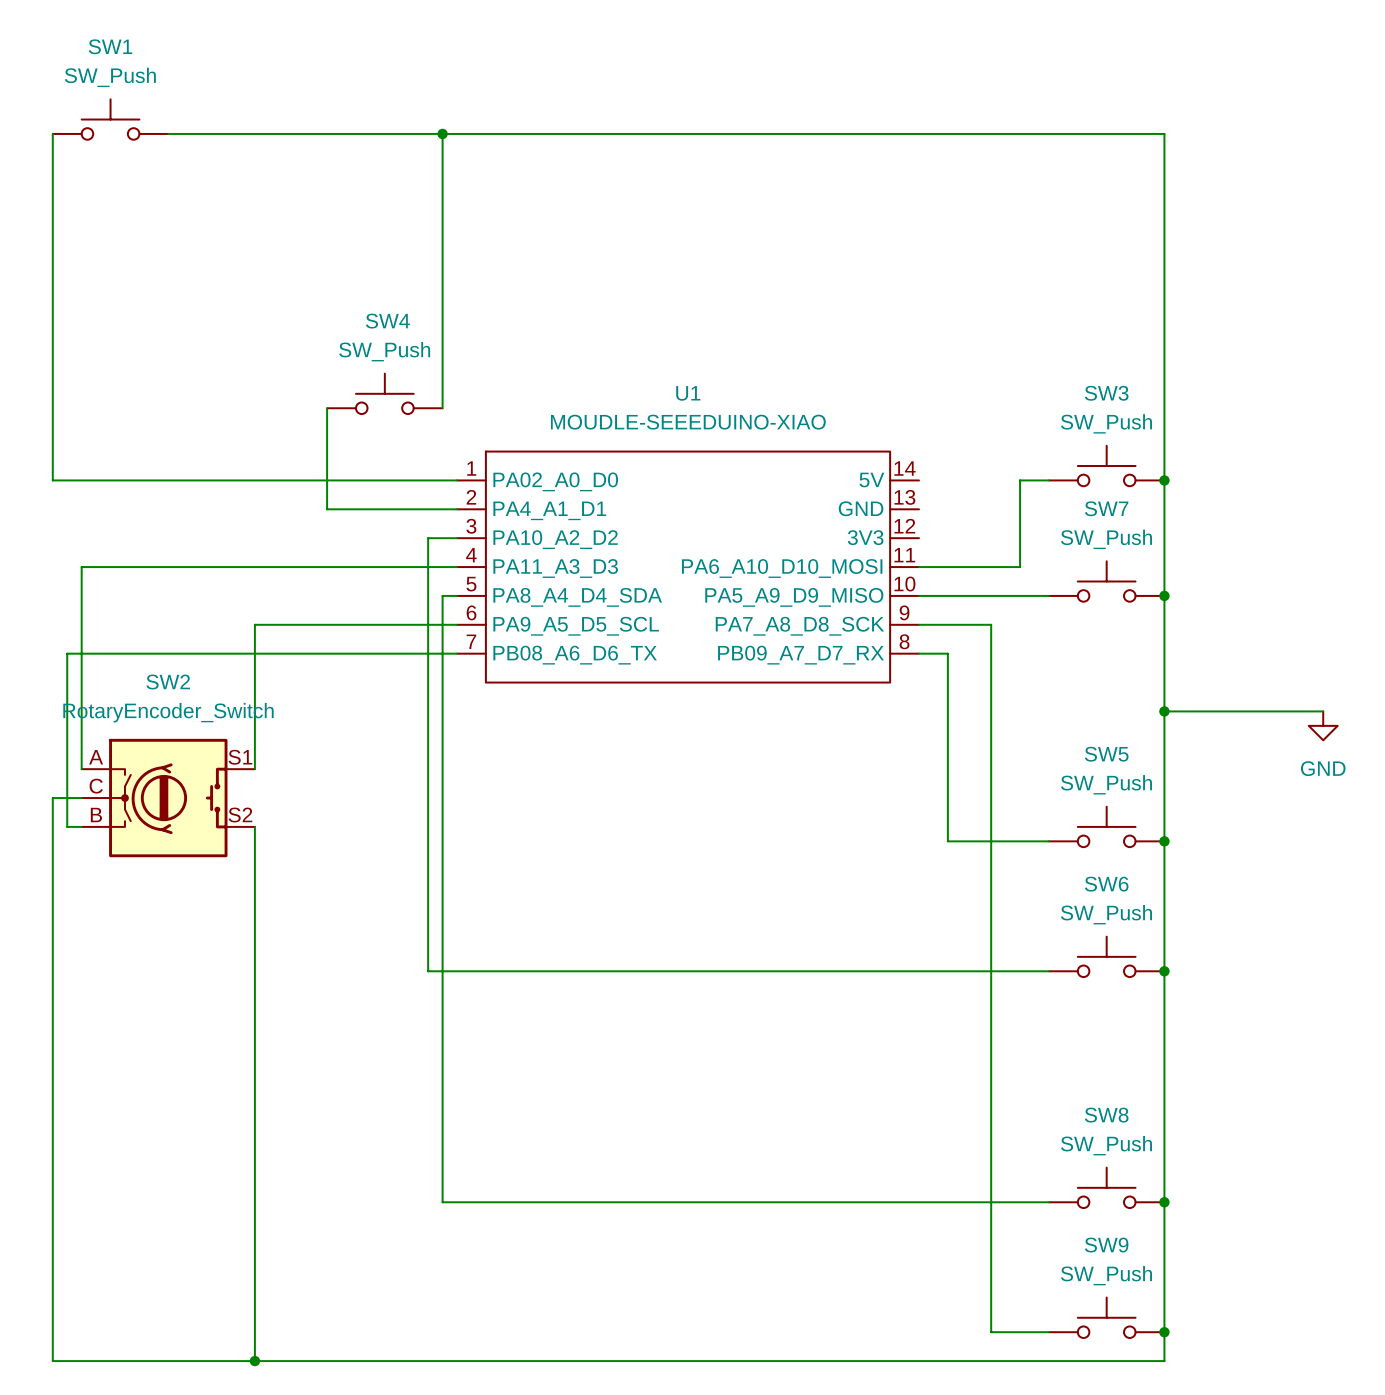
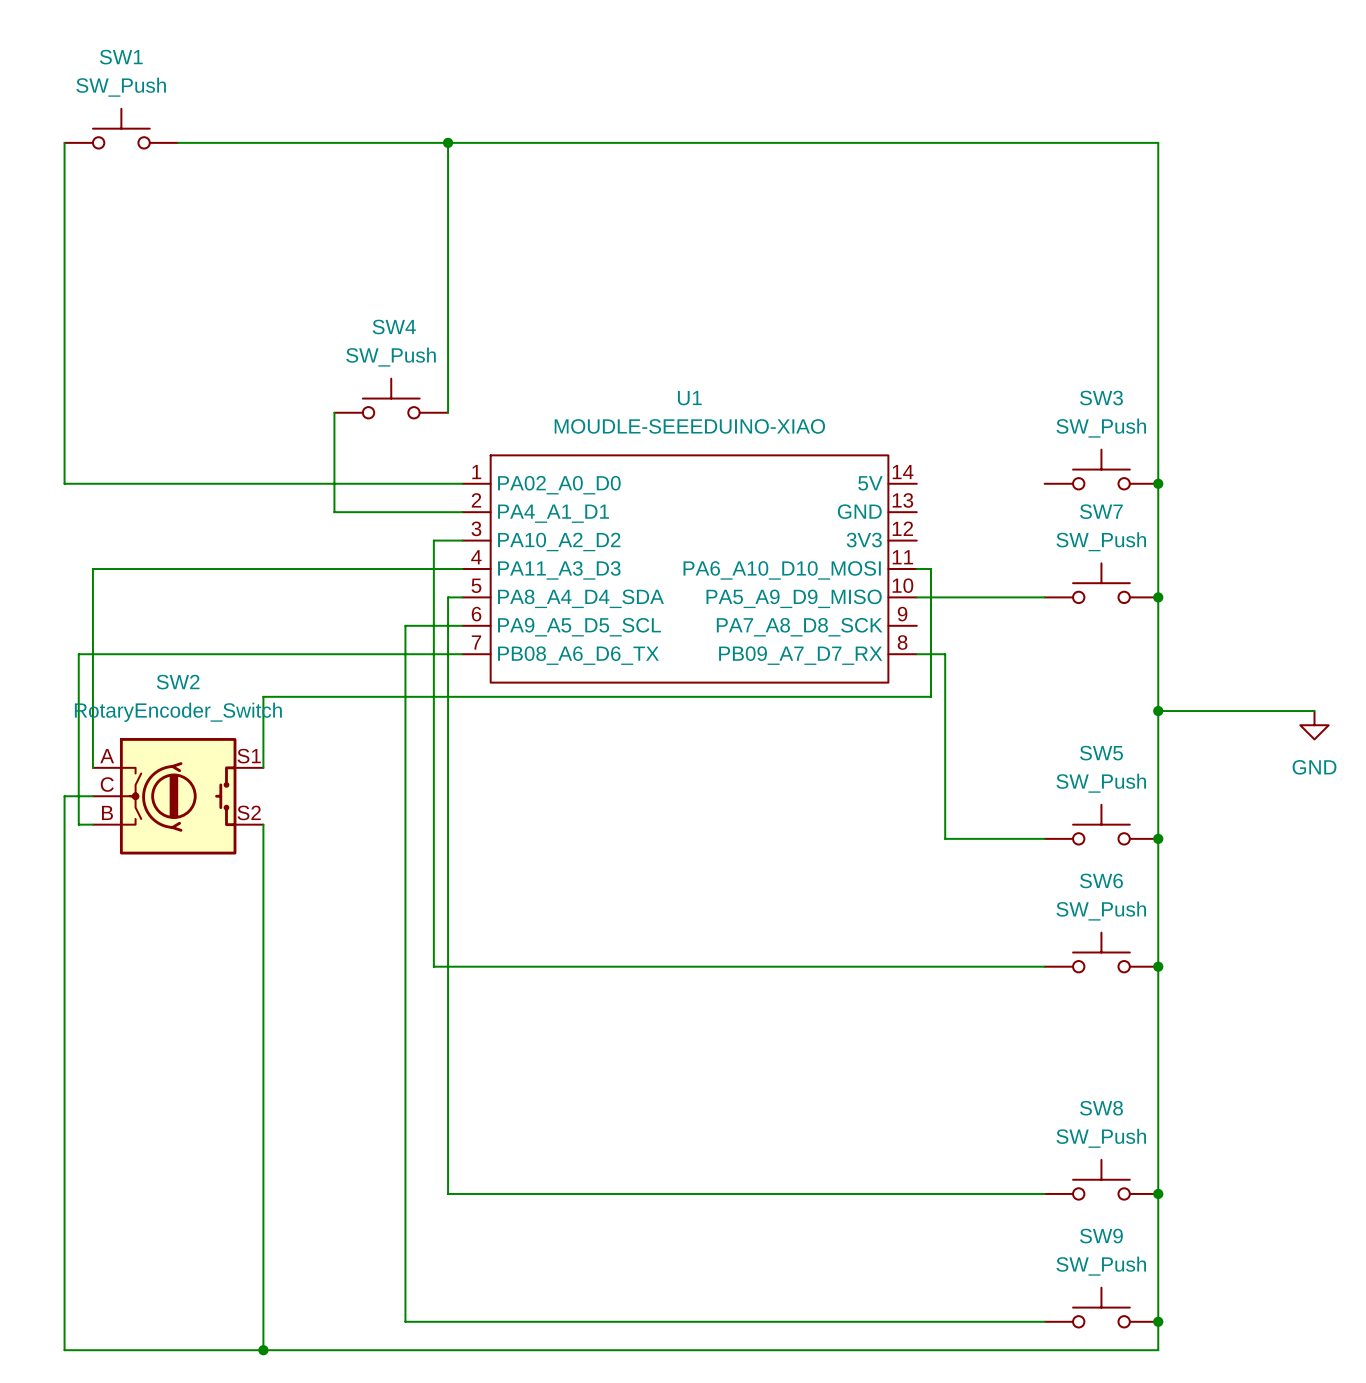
wire: (1048, 480) (1020, 480) (1020, 567) (933, 567) -> none
wire: (399, 624) (254, 624) (254, 696) -> (930, 568) (930, 696) (263, 696)
wire: (919, 624) (991, 624) (991, 1332) -> (405, 625) (405, 1321) (987, 1321)

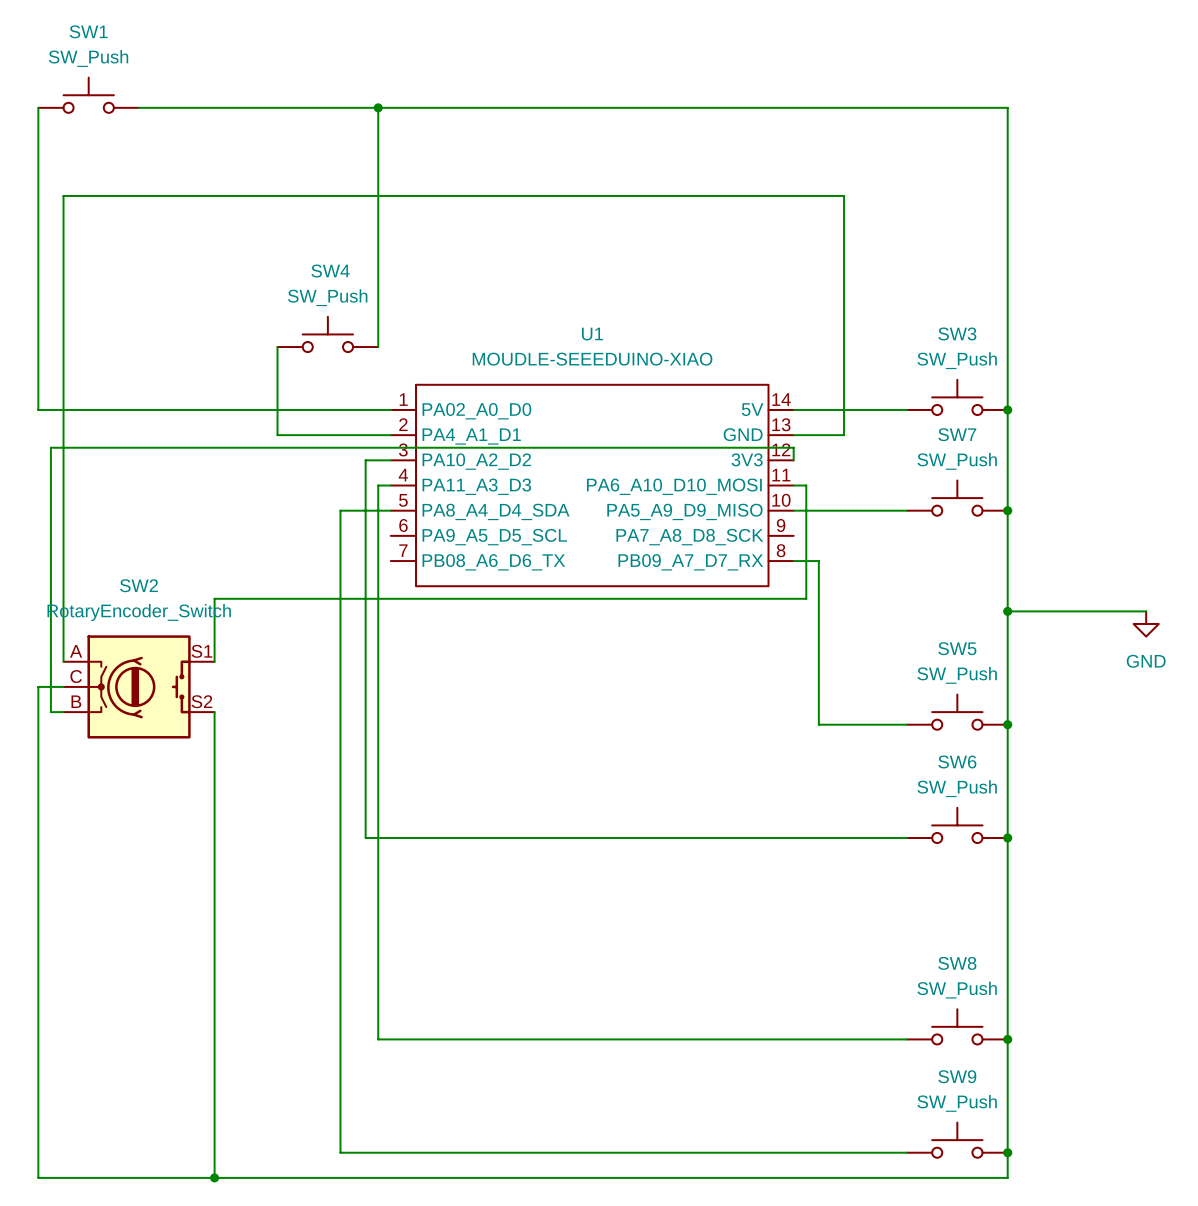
wire: none -> (793, 409) (906, 409)
wire: (92, 568) (448, 568) -> (63, 485) (63, 195) (844, 195) (844, 435) (793, 435)
wire: (405, 625) (462, 625) -> (340, 535) (340, 510) (378, 510) (378, 485)
wire: (78, 654) (462, 654) -> (50, 561) (50, 447) (793, 447) (793, 460)

